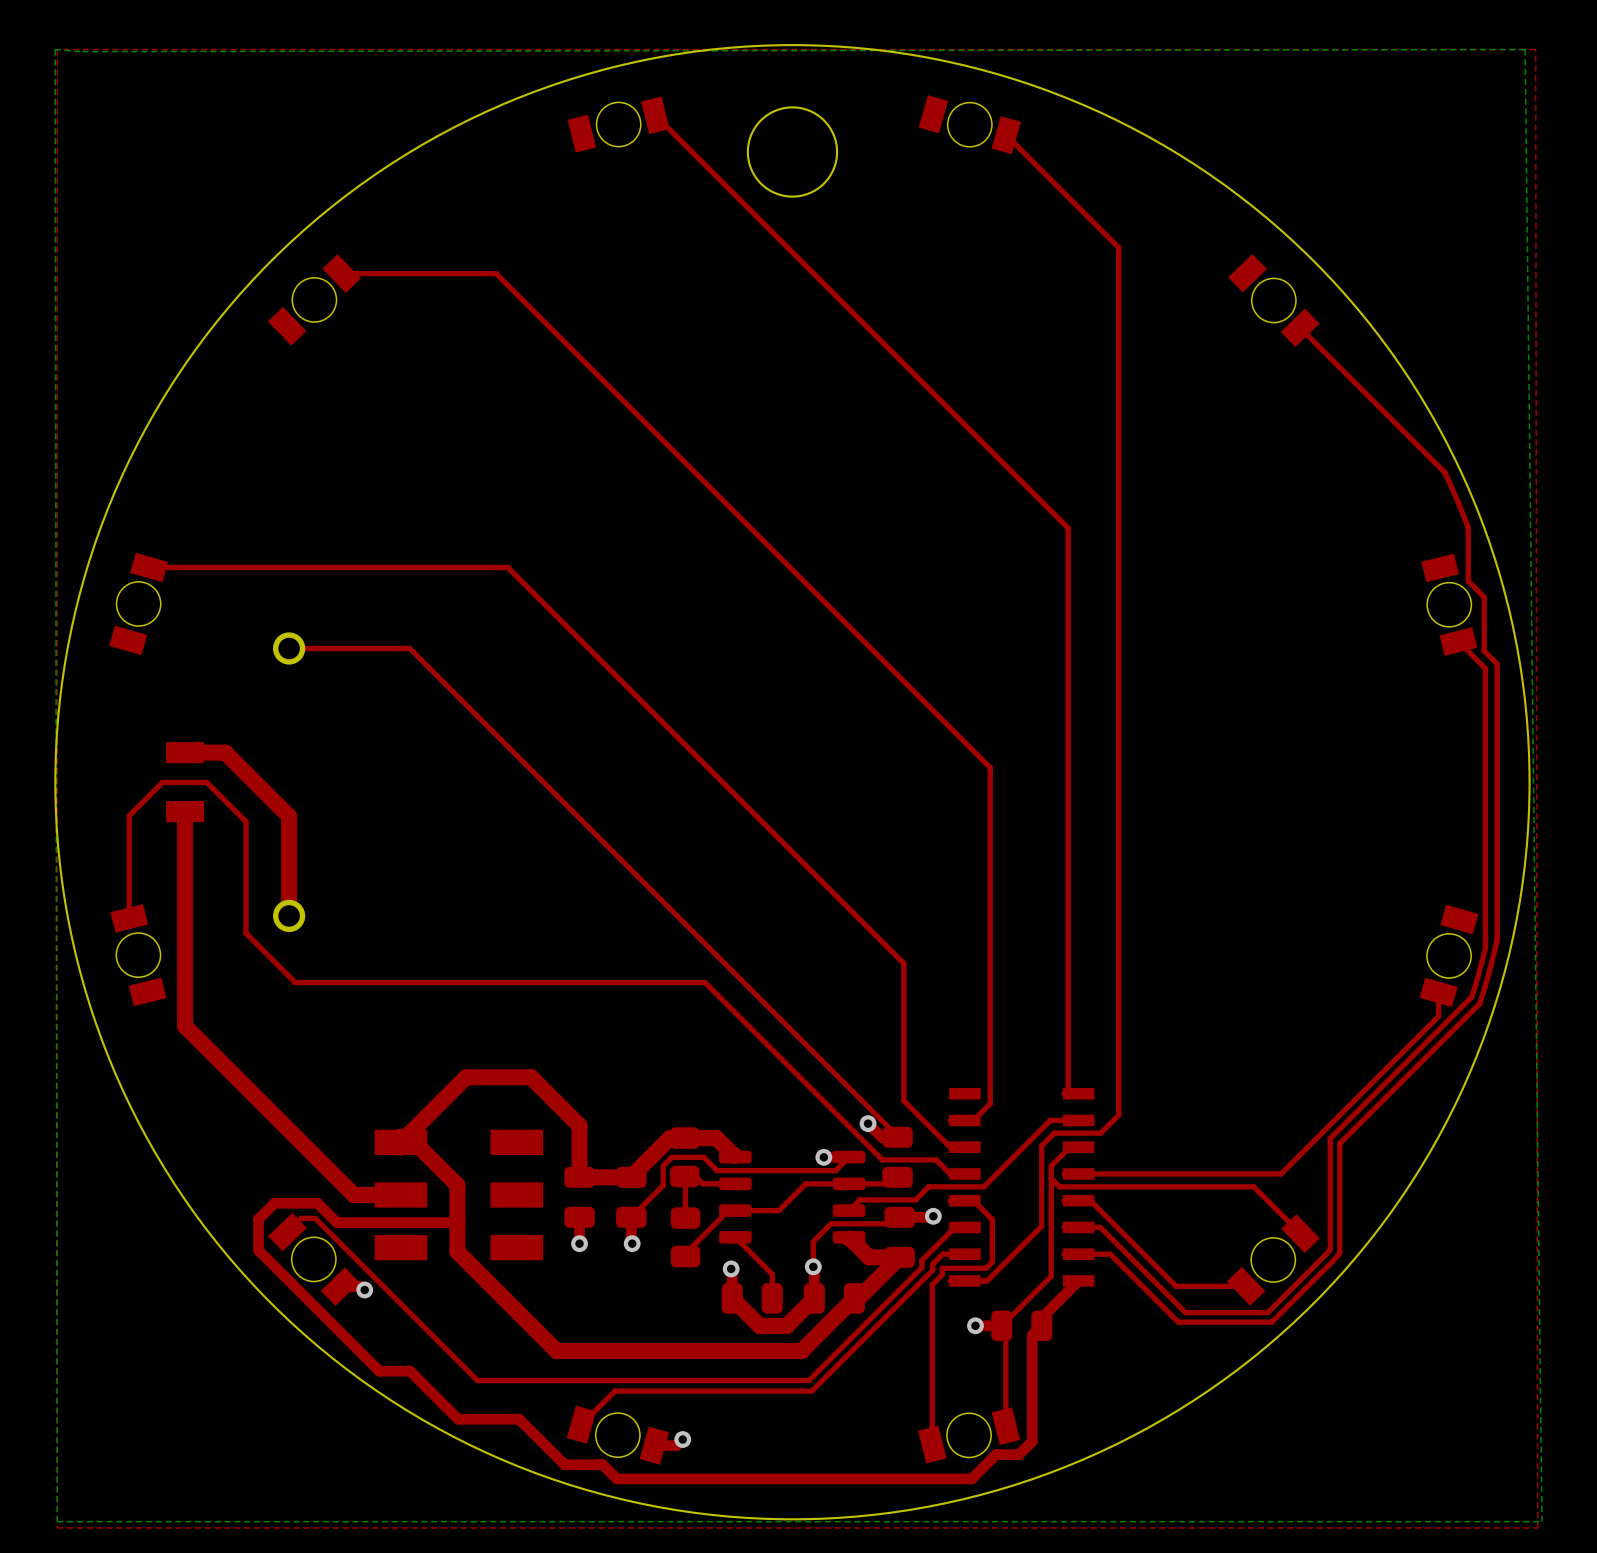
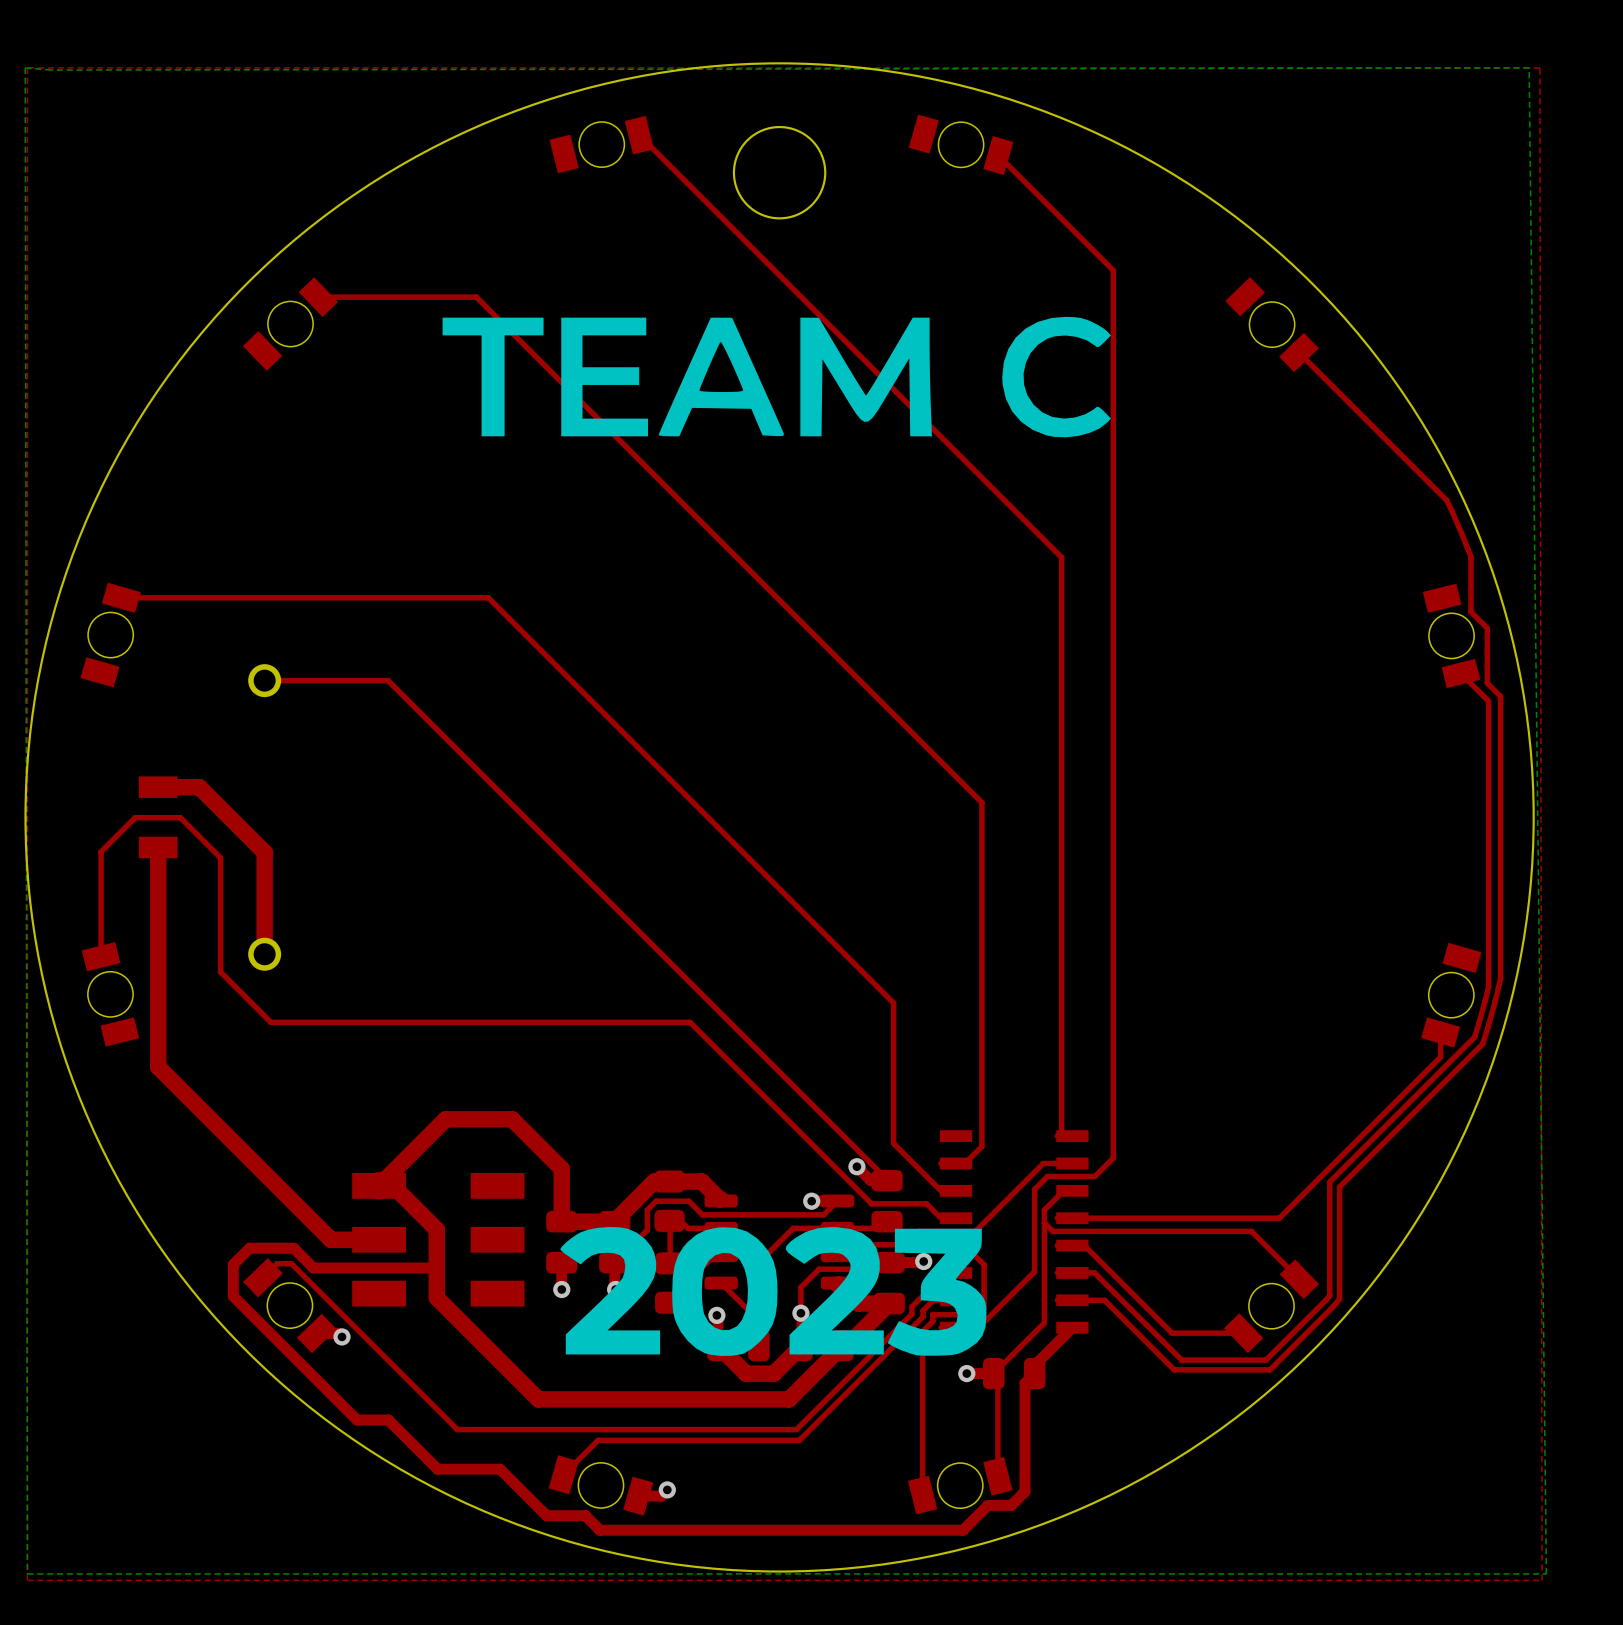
drawing: none -> [442, 316, 1111, 438]
drawing: none -> [560, 1226, 987, 1356]

